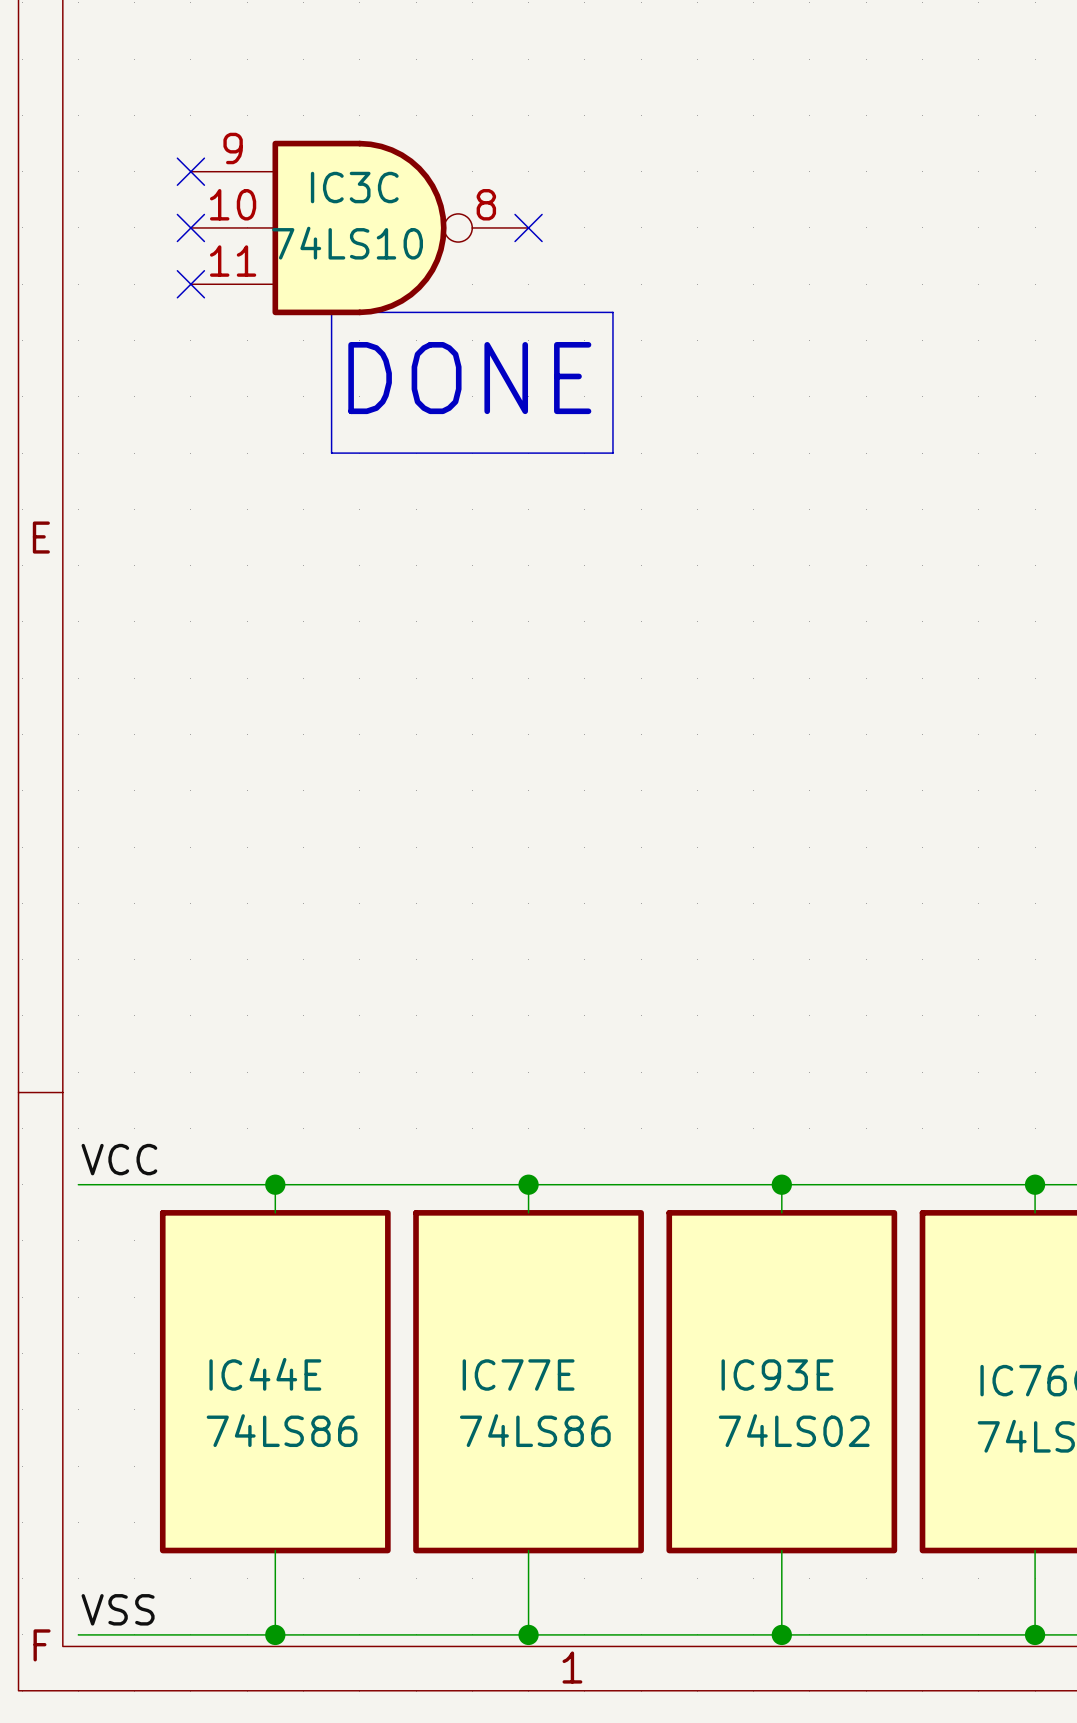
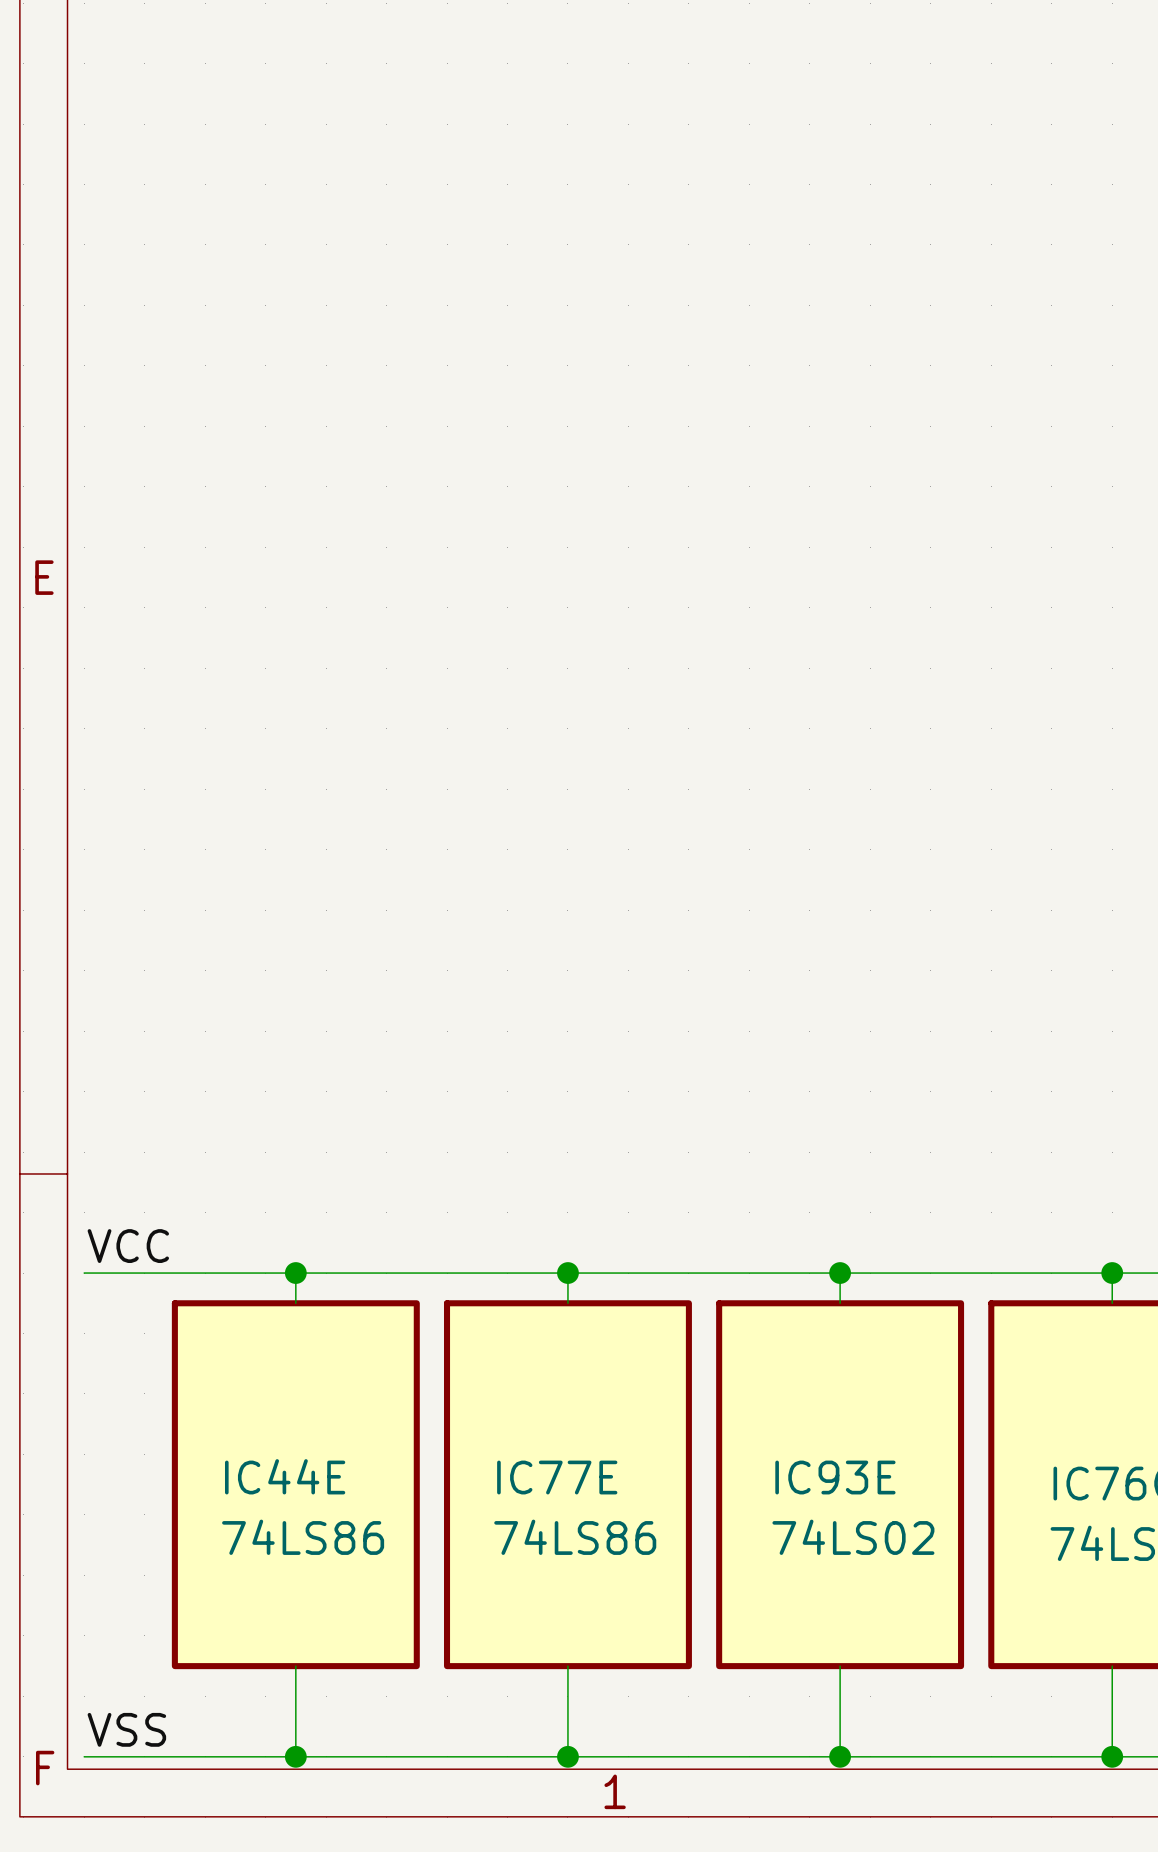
no-connect mark: (190, 171) -> none
no-connect mark: (190, 227) -> none
IC3C: 74LS10 (359, 227) -> none
no-connect mark: (528, 227) -> none
no-connect mark: (190, 284) -> none
line: (331, 312) (612, 312) (612, 453) (331, 453) (331, 312) -> none
text: DONE (469, 378) -> none

